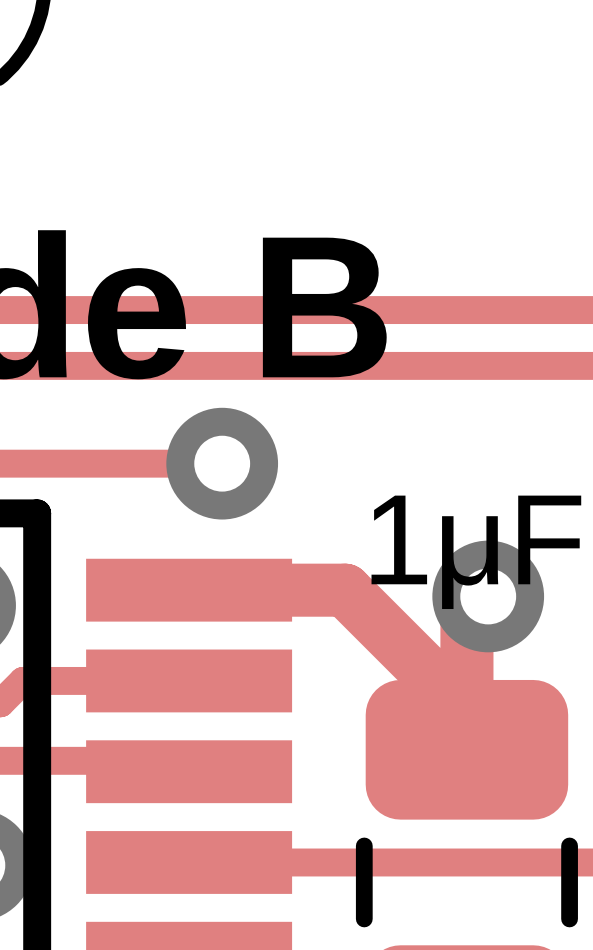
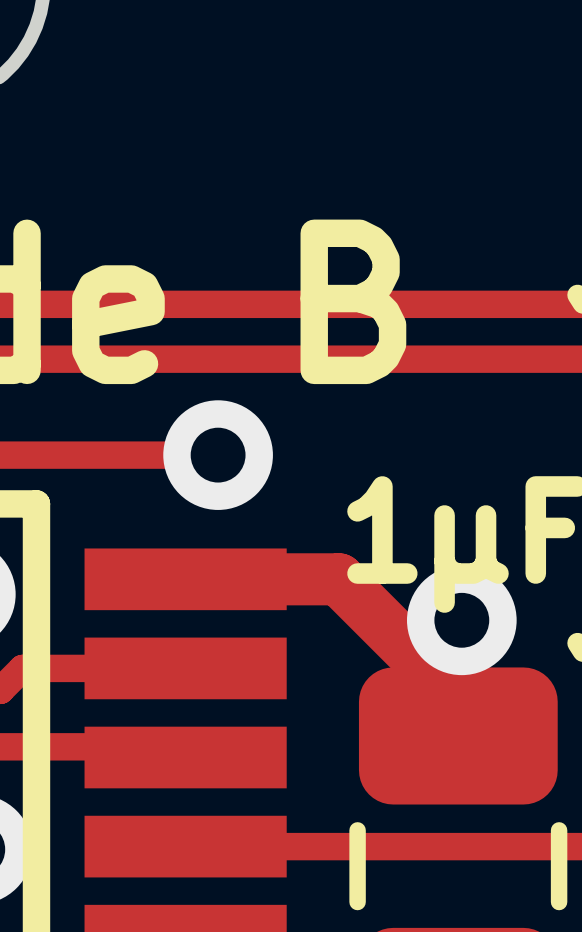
via position: (488, 596) -> (461, 620)

